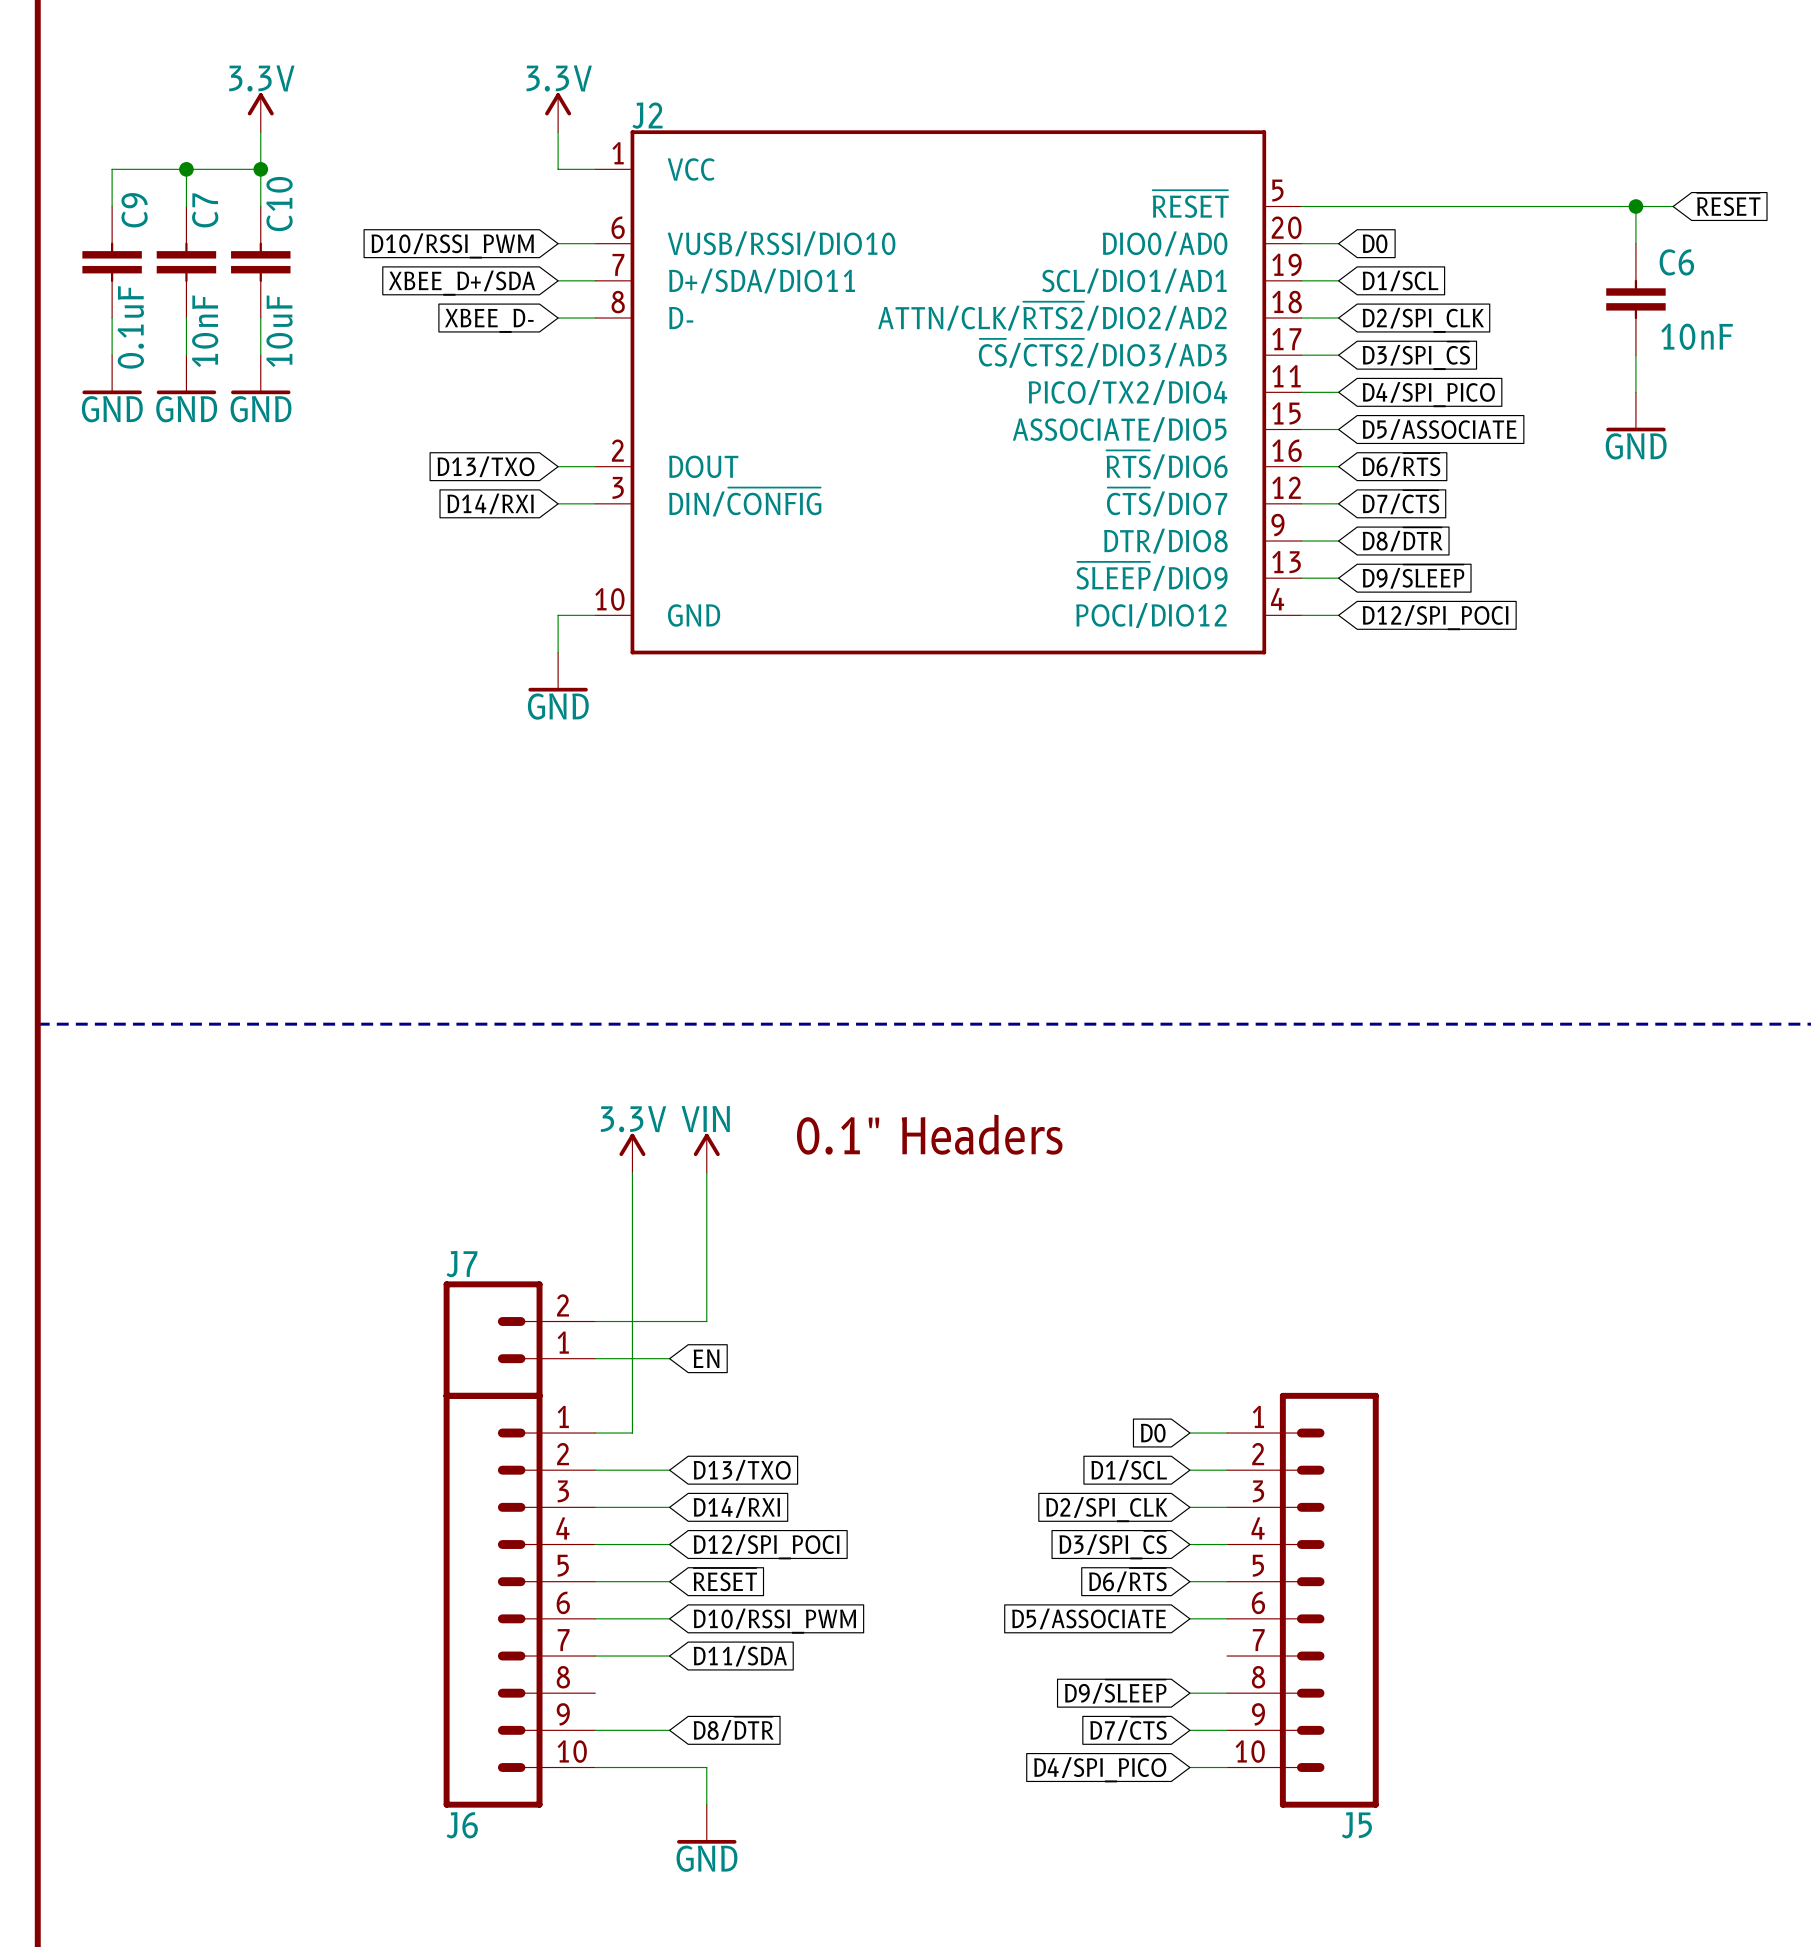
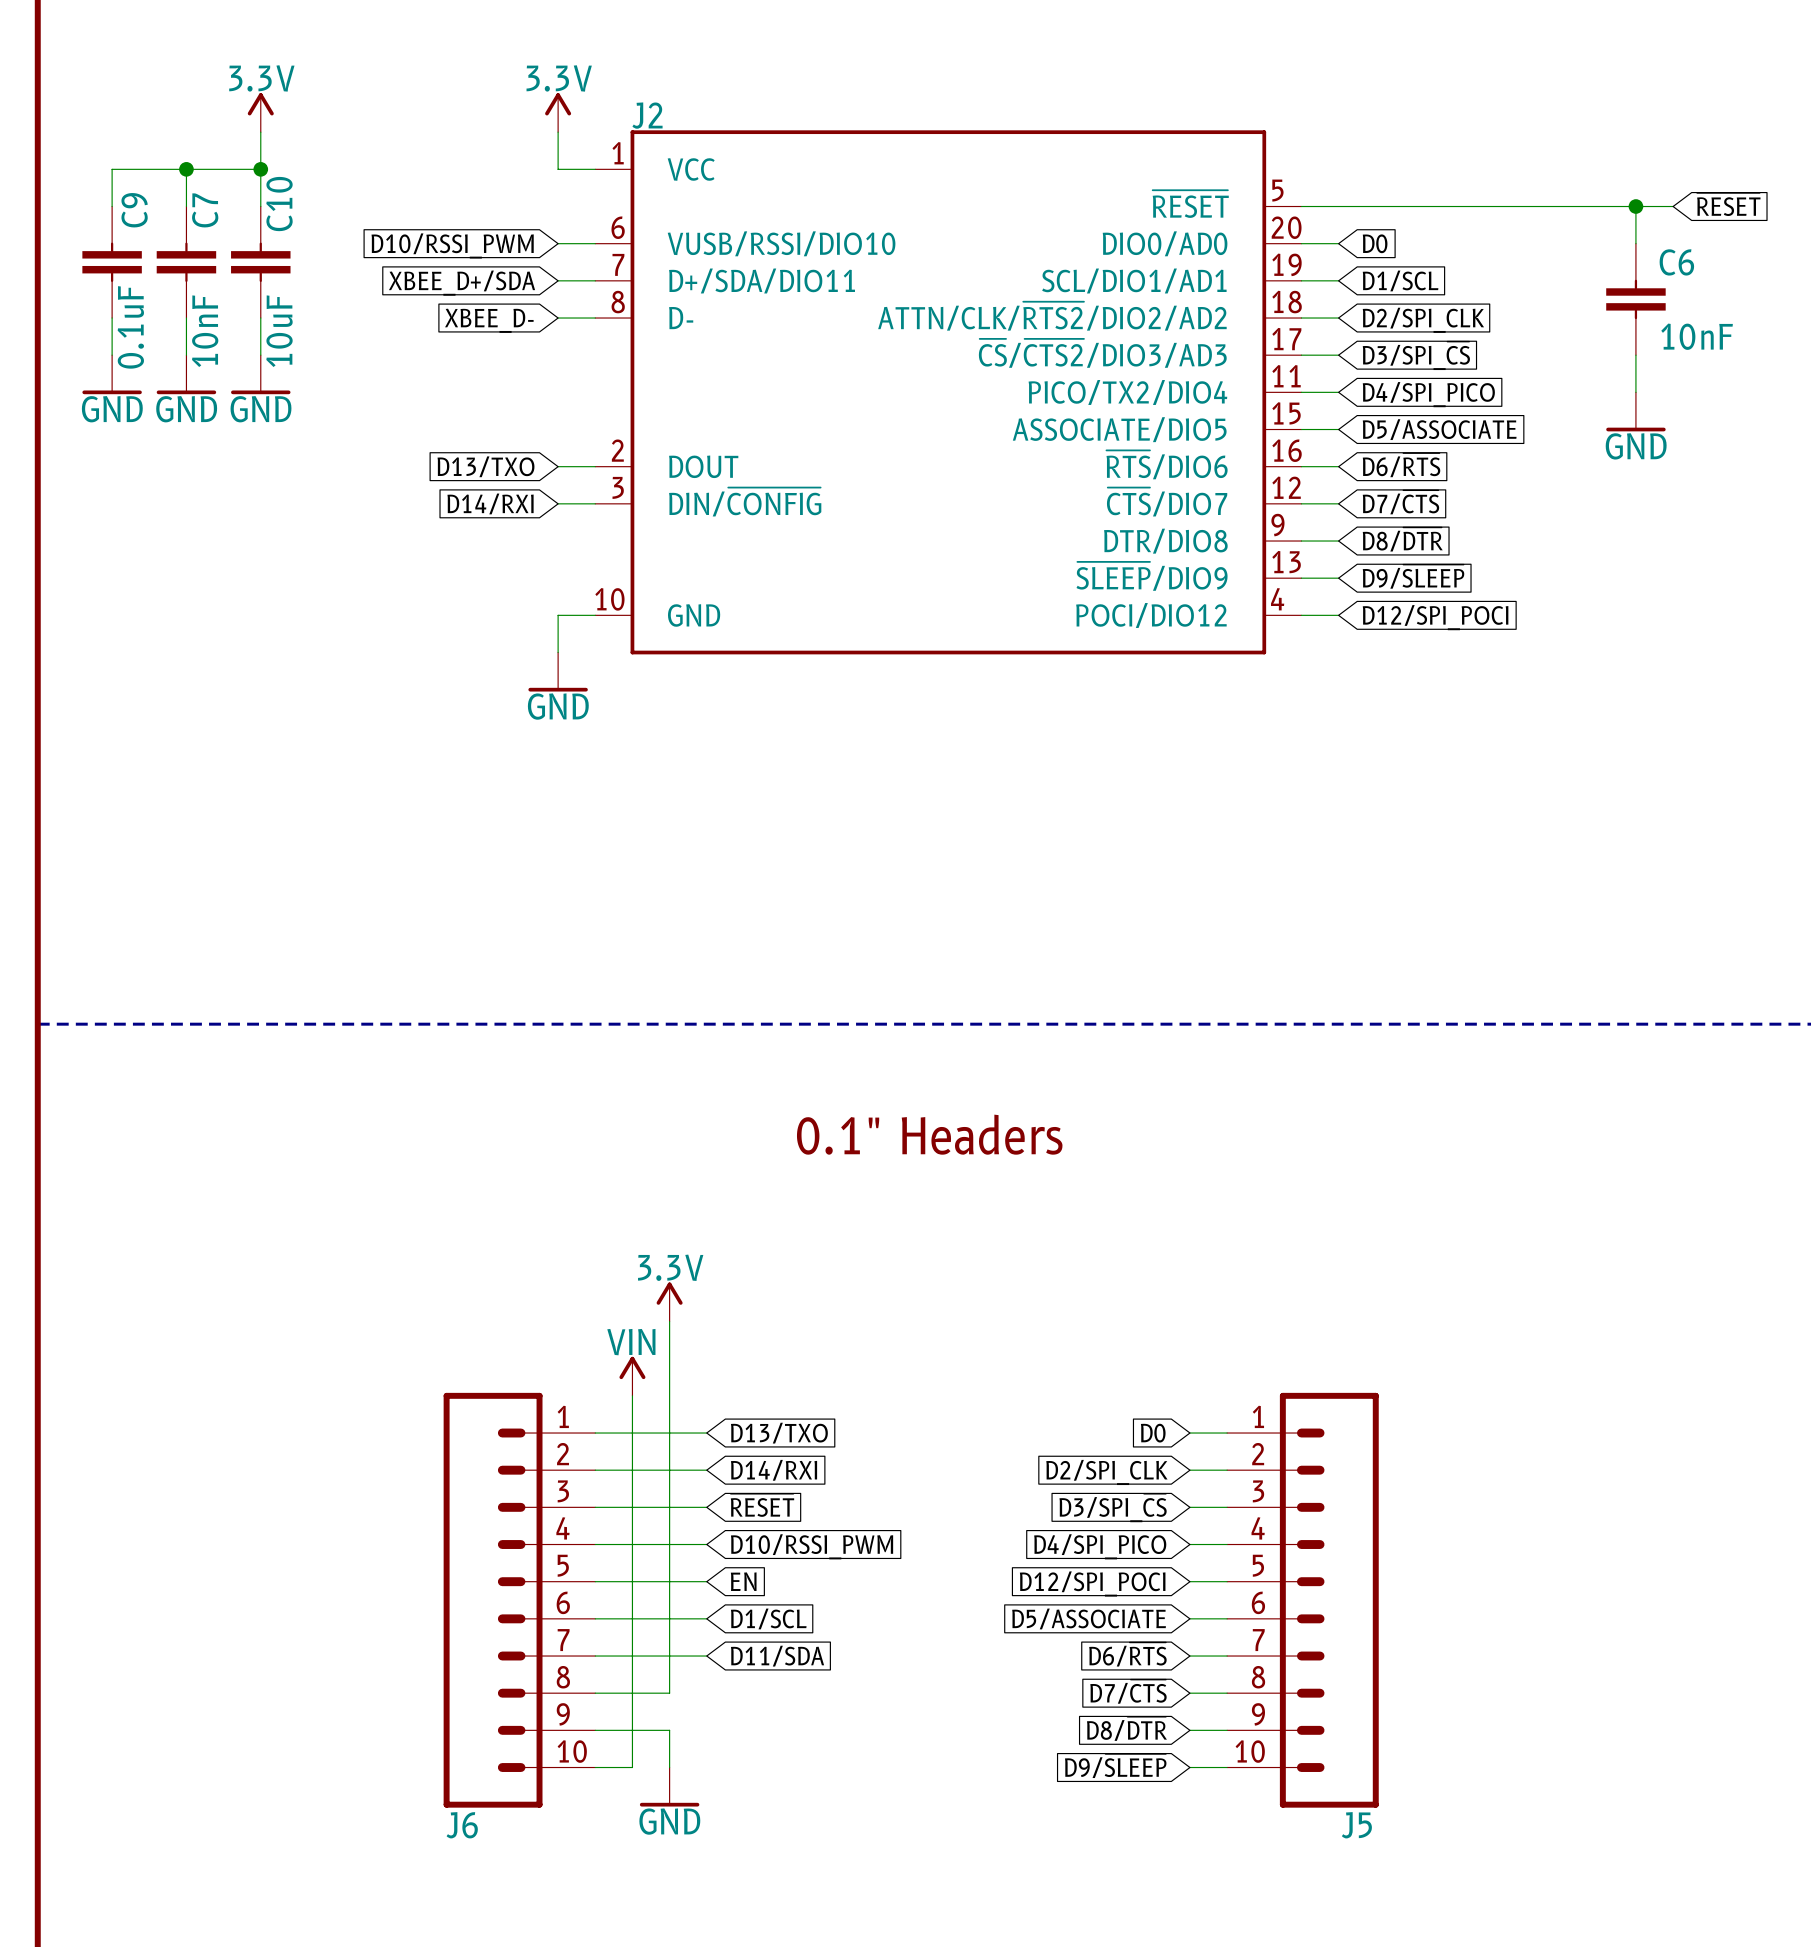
power symbol position: 3.3V (632, 1153) -> 3.3V (669, 1302)
power symbol position: VIN (706, 1153) -> VIN (632, 1376)
wire: (632, 1172) (632, 1395) -> none
wire: (706, 1172) (706, 1321) (595, 1321) -> none
wire: none -> (669, 1321) (669, 1693) (595, 1693)
J7: (519, 1340) -> none
wire: (595, 1358) (669, 1358) -> none
global label position: EN (706, 1358) -> EN (743, 1581)
wire: none -> (669, 1470) (706, 1470)
global label position: D13/TXO (742, 1470) -> D13/TXO (779, 1433)
global label: D1/SCL (1129, 1470) -> D2/SPI_CLK (1106, 1472)
wire: none -> (669, 1507) (706, 1507)
global label position: D14/RXI (736, 1507) -> D14/RXI (774, 1470)
global label: D2/SPI_CLK (1106, 1509) -> D3/SPI_~{CS} (1113, 1507)
wire: none -> (669, 1544) (706, 1544)
global label: D3/SPI_~{CS} (1113, 1545) -> D4/SPI_PICO (1100, 1546)
global label: D12/SPI_POCI (766, 1546) -> none
global label position: ~{RESET} (725, 1579) -> ~{RESET} (762, 1505)
global label: D6/~{RTS} (1127, 1580) -> D12/SPI_POCI (1092, 1583)
wire: none -> (669, 1581) (706, 1581)
wire: none -> (669, 1618) (706, 1618)
global label: none -> D1/SCL (768, 1618)
global label position: D10/RSSI_PWM (774, 1621) -> D10/RSSI_PWM (812, 1546)
global label: none -> D6/~{RTS} (1127, 1654)
wire: none -> (669, 1656) (706, 1656)
global label position: D11/SDA (740, 1656) -> D11/SDA (777, 1656)
wire: none -> (1189, 1656) (1227, 1656)
global label: D9/~{SLEEP} (1115, 1691) -> D7/~{CTS} (1128, 1691)
global label: D8/~{DTR} (733, 1728) -> none
global label: D7/~{CTS} (1128, 1728) -> D8/~{DTR} (1126, 1728)
wire: none -> (669, 1730) (669, 1767)
wire: (632, 1767) (706, 1767) (706, 1804) -> (632, 1767) (632, 1433) (706, 1433)
global label: D4/SPI_PICO (1100, 1769) -> D9/~{SLEEP} (1115, 1765)
power symbol position: GND (706, 1824) -> GND (669, 1787)

